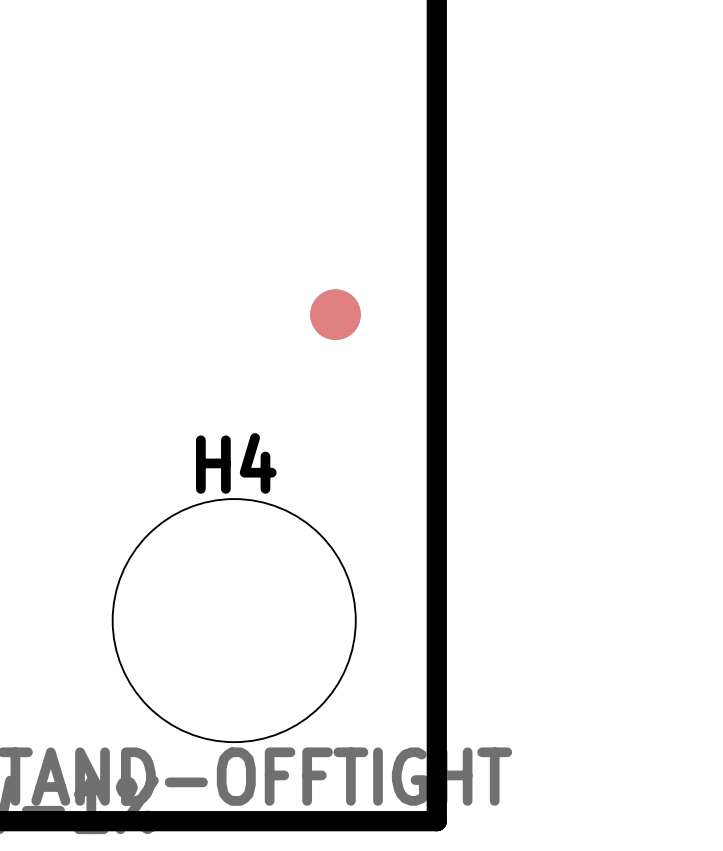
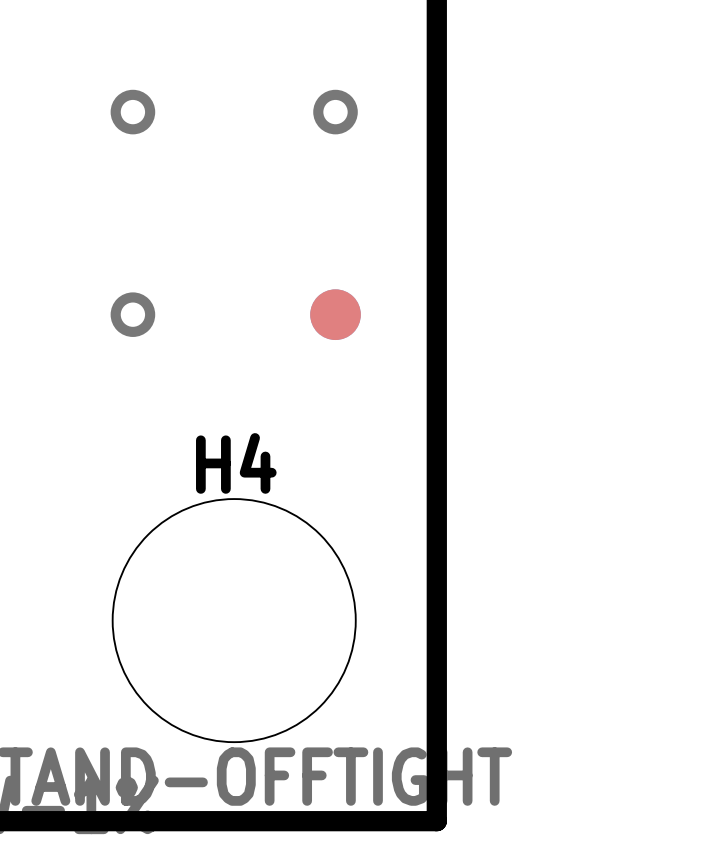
via: none -> (132, 112)
via: none -> (335, 112)
via: none -> (132, 314)

